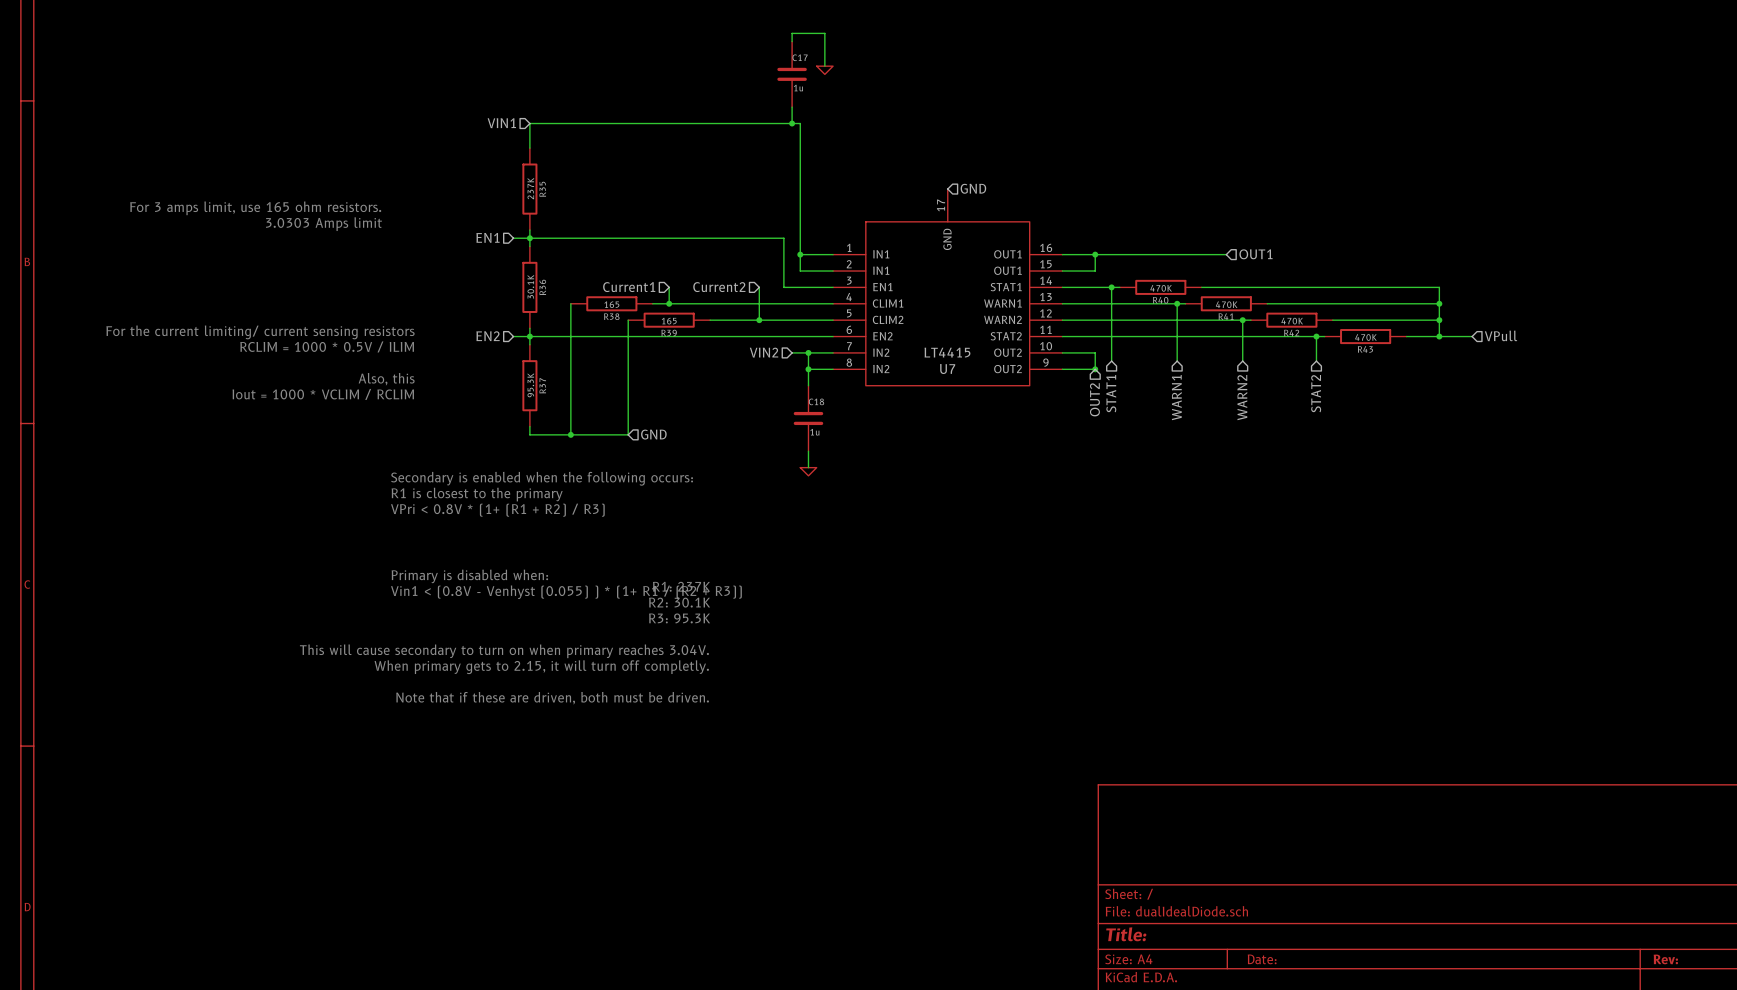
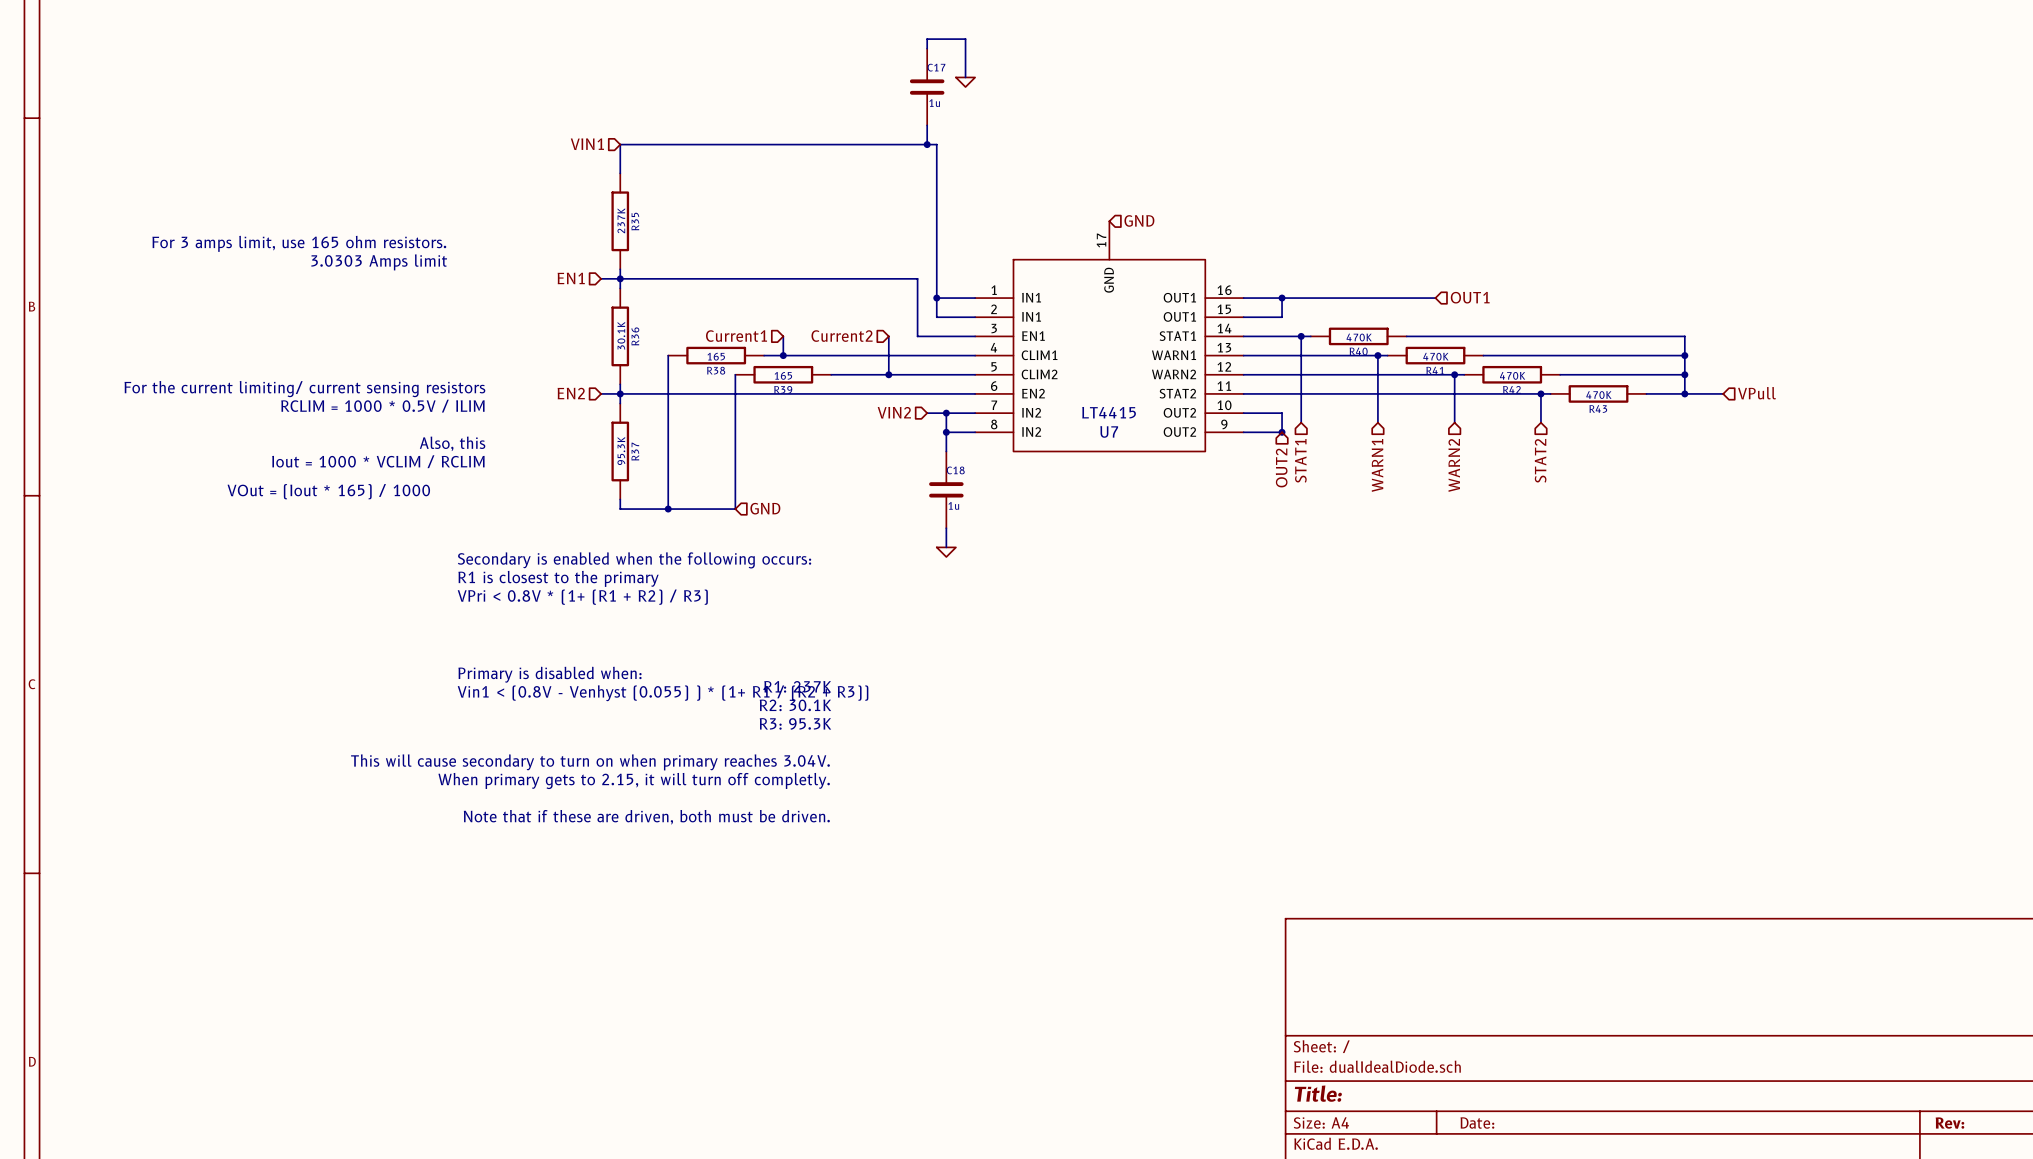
text: none -> VOut = (Iout * 165) / 1000 (328, 491)

